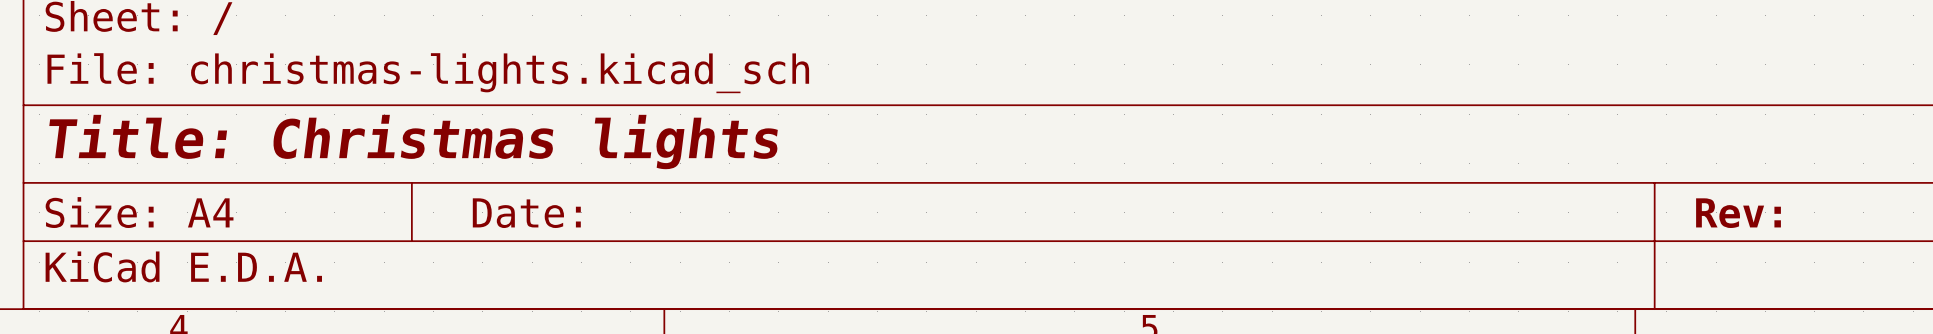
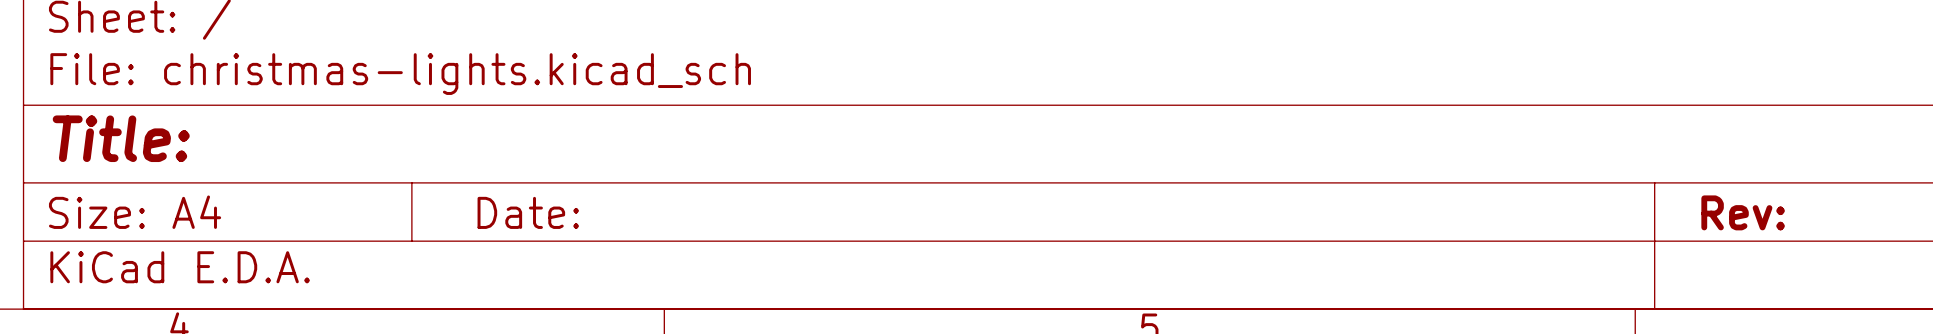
title block: Title: Christmas lights (413, 142) -> Title: (121, 138)

